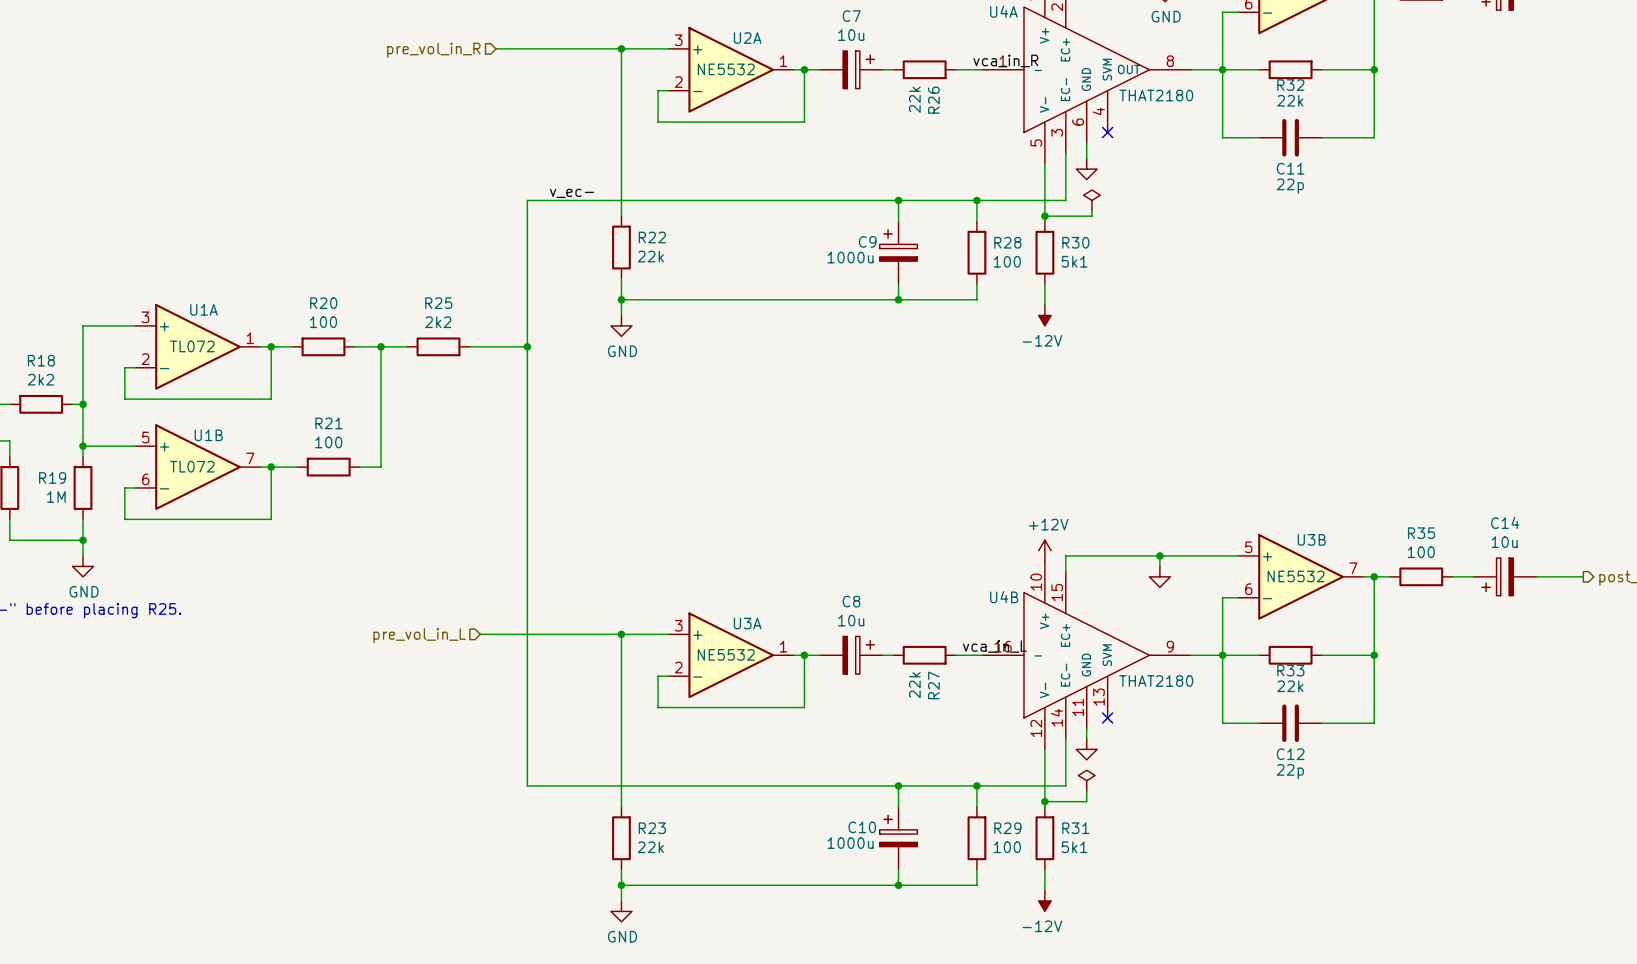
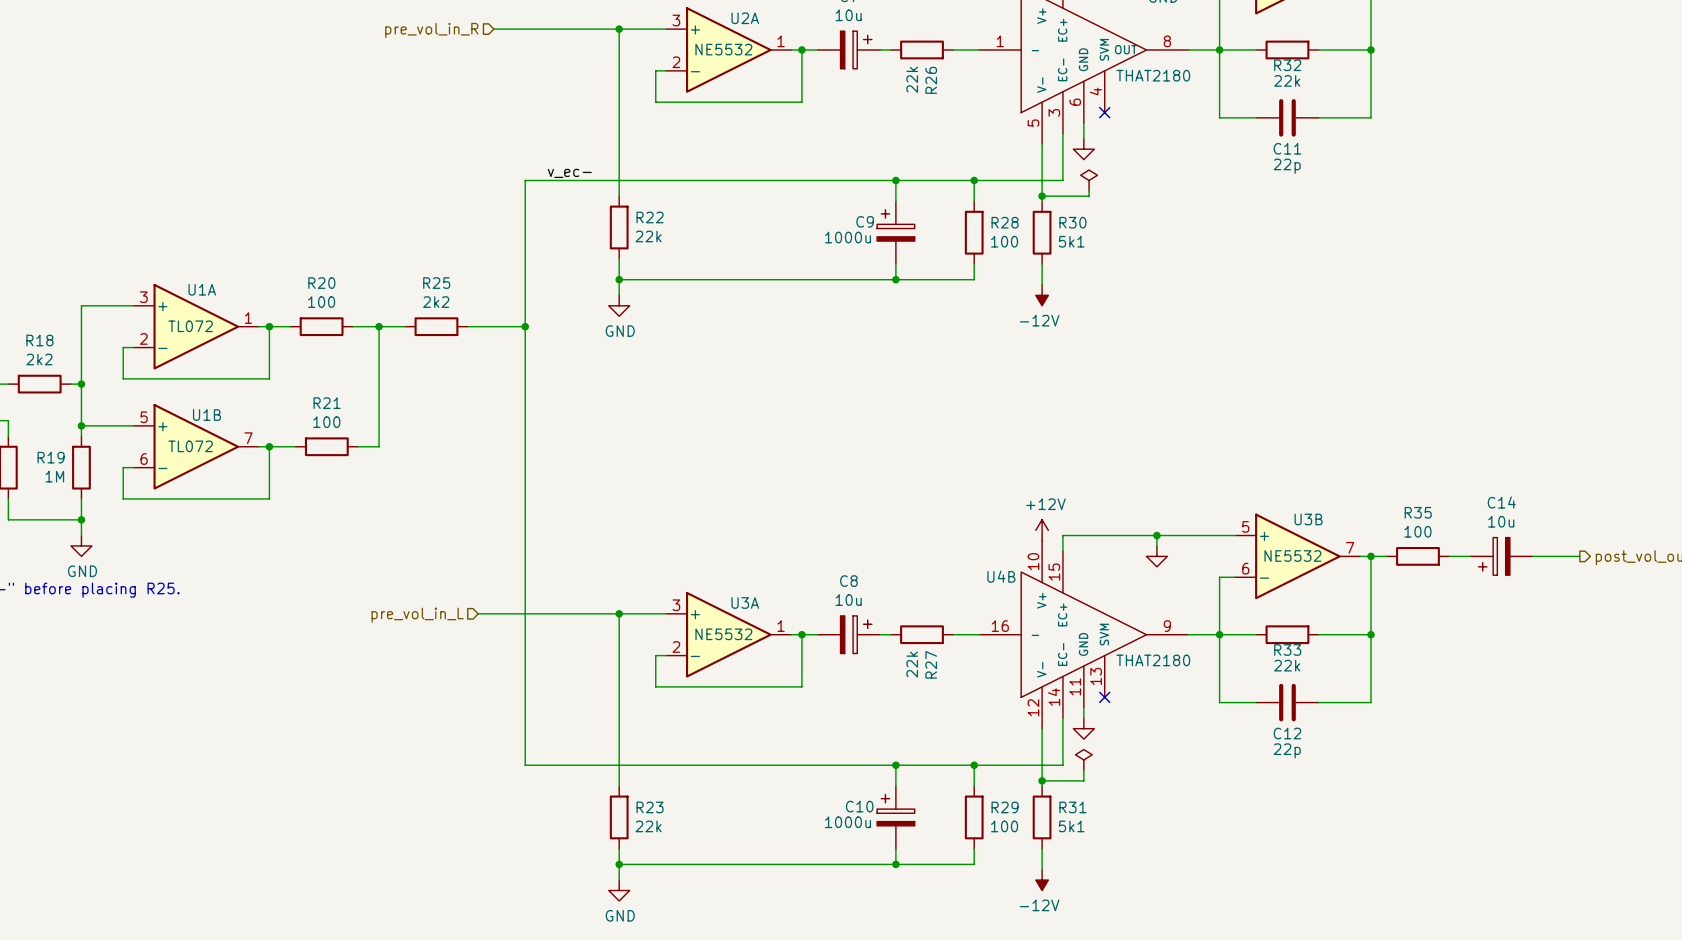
label: vca_in_R (1005, 60) -> none
label: vca_in_L (994, 646) -> none

